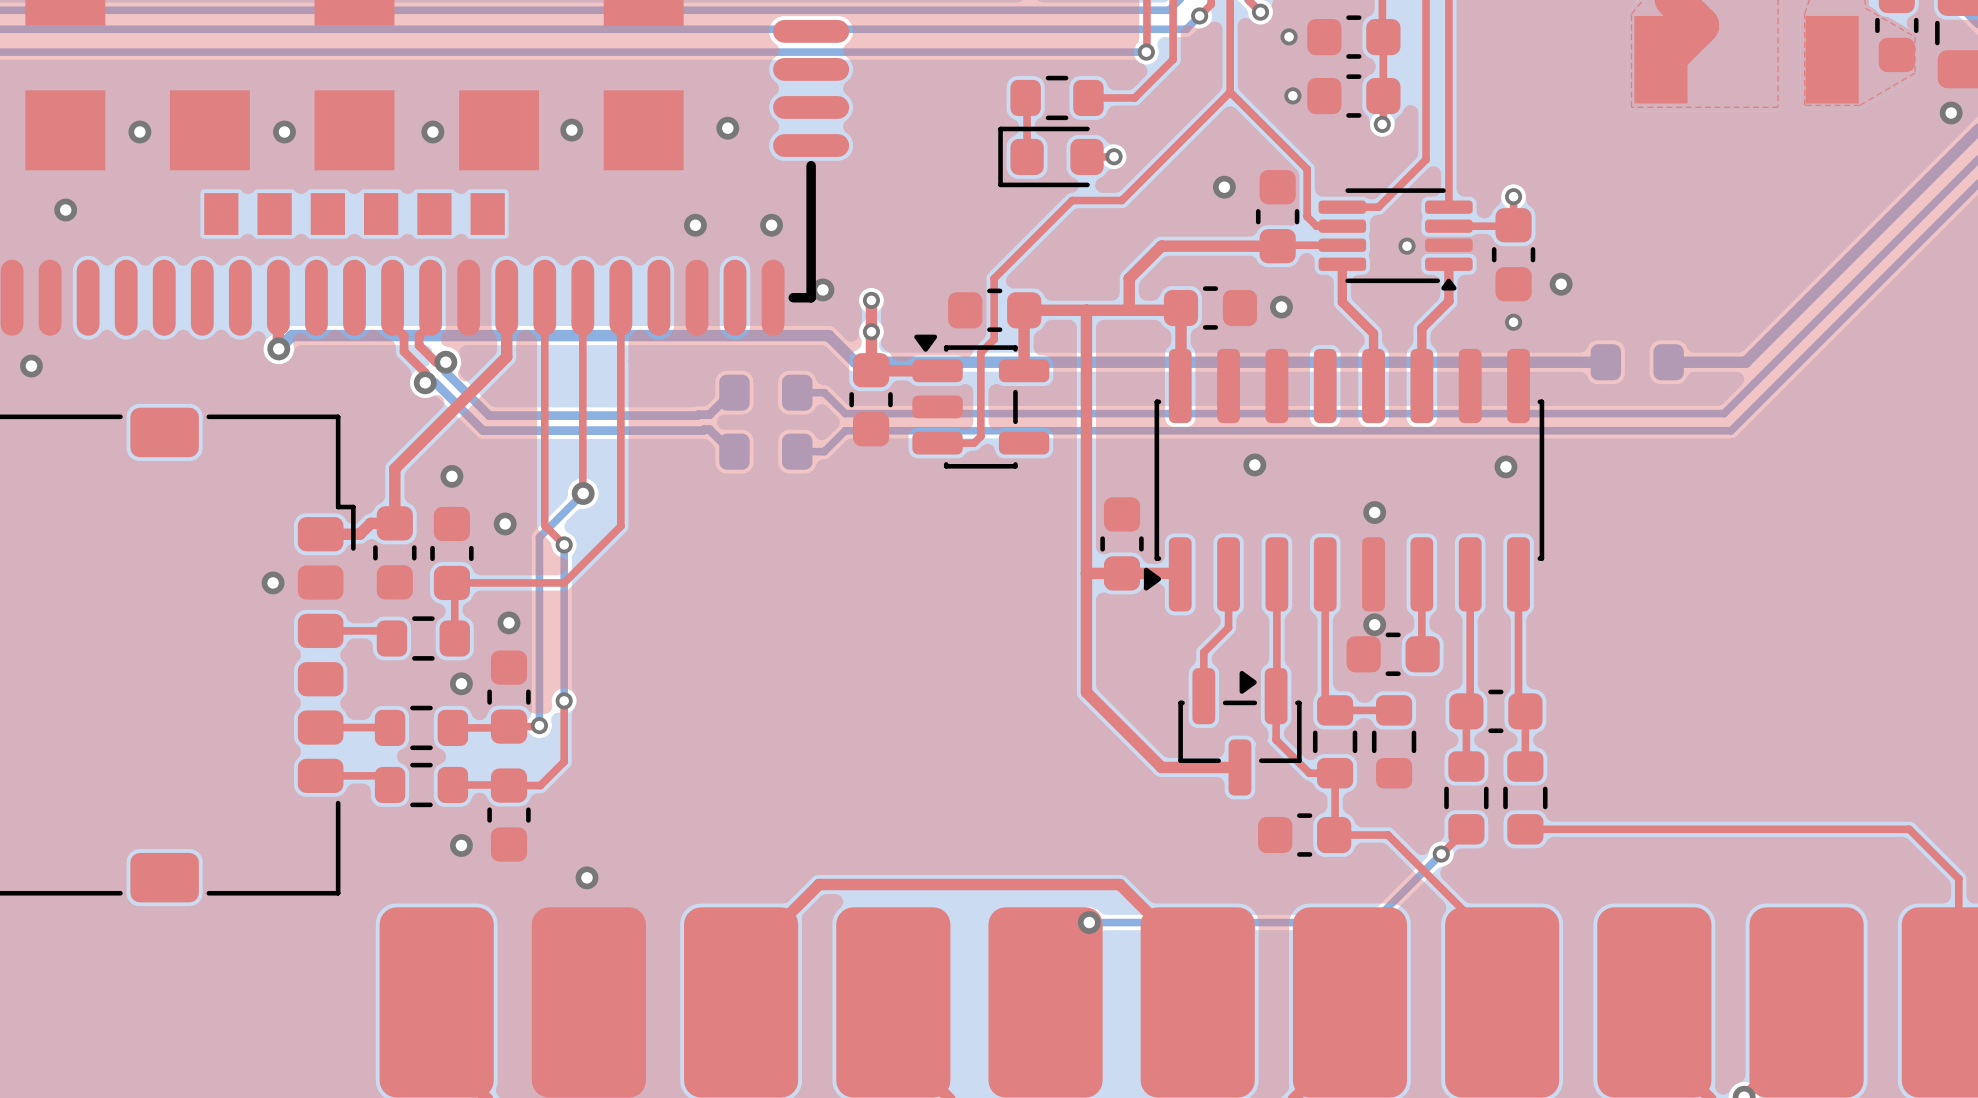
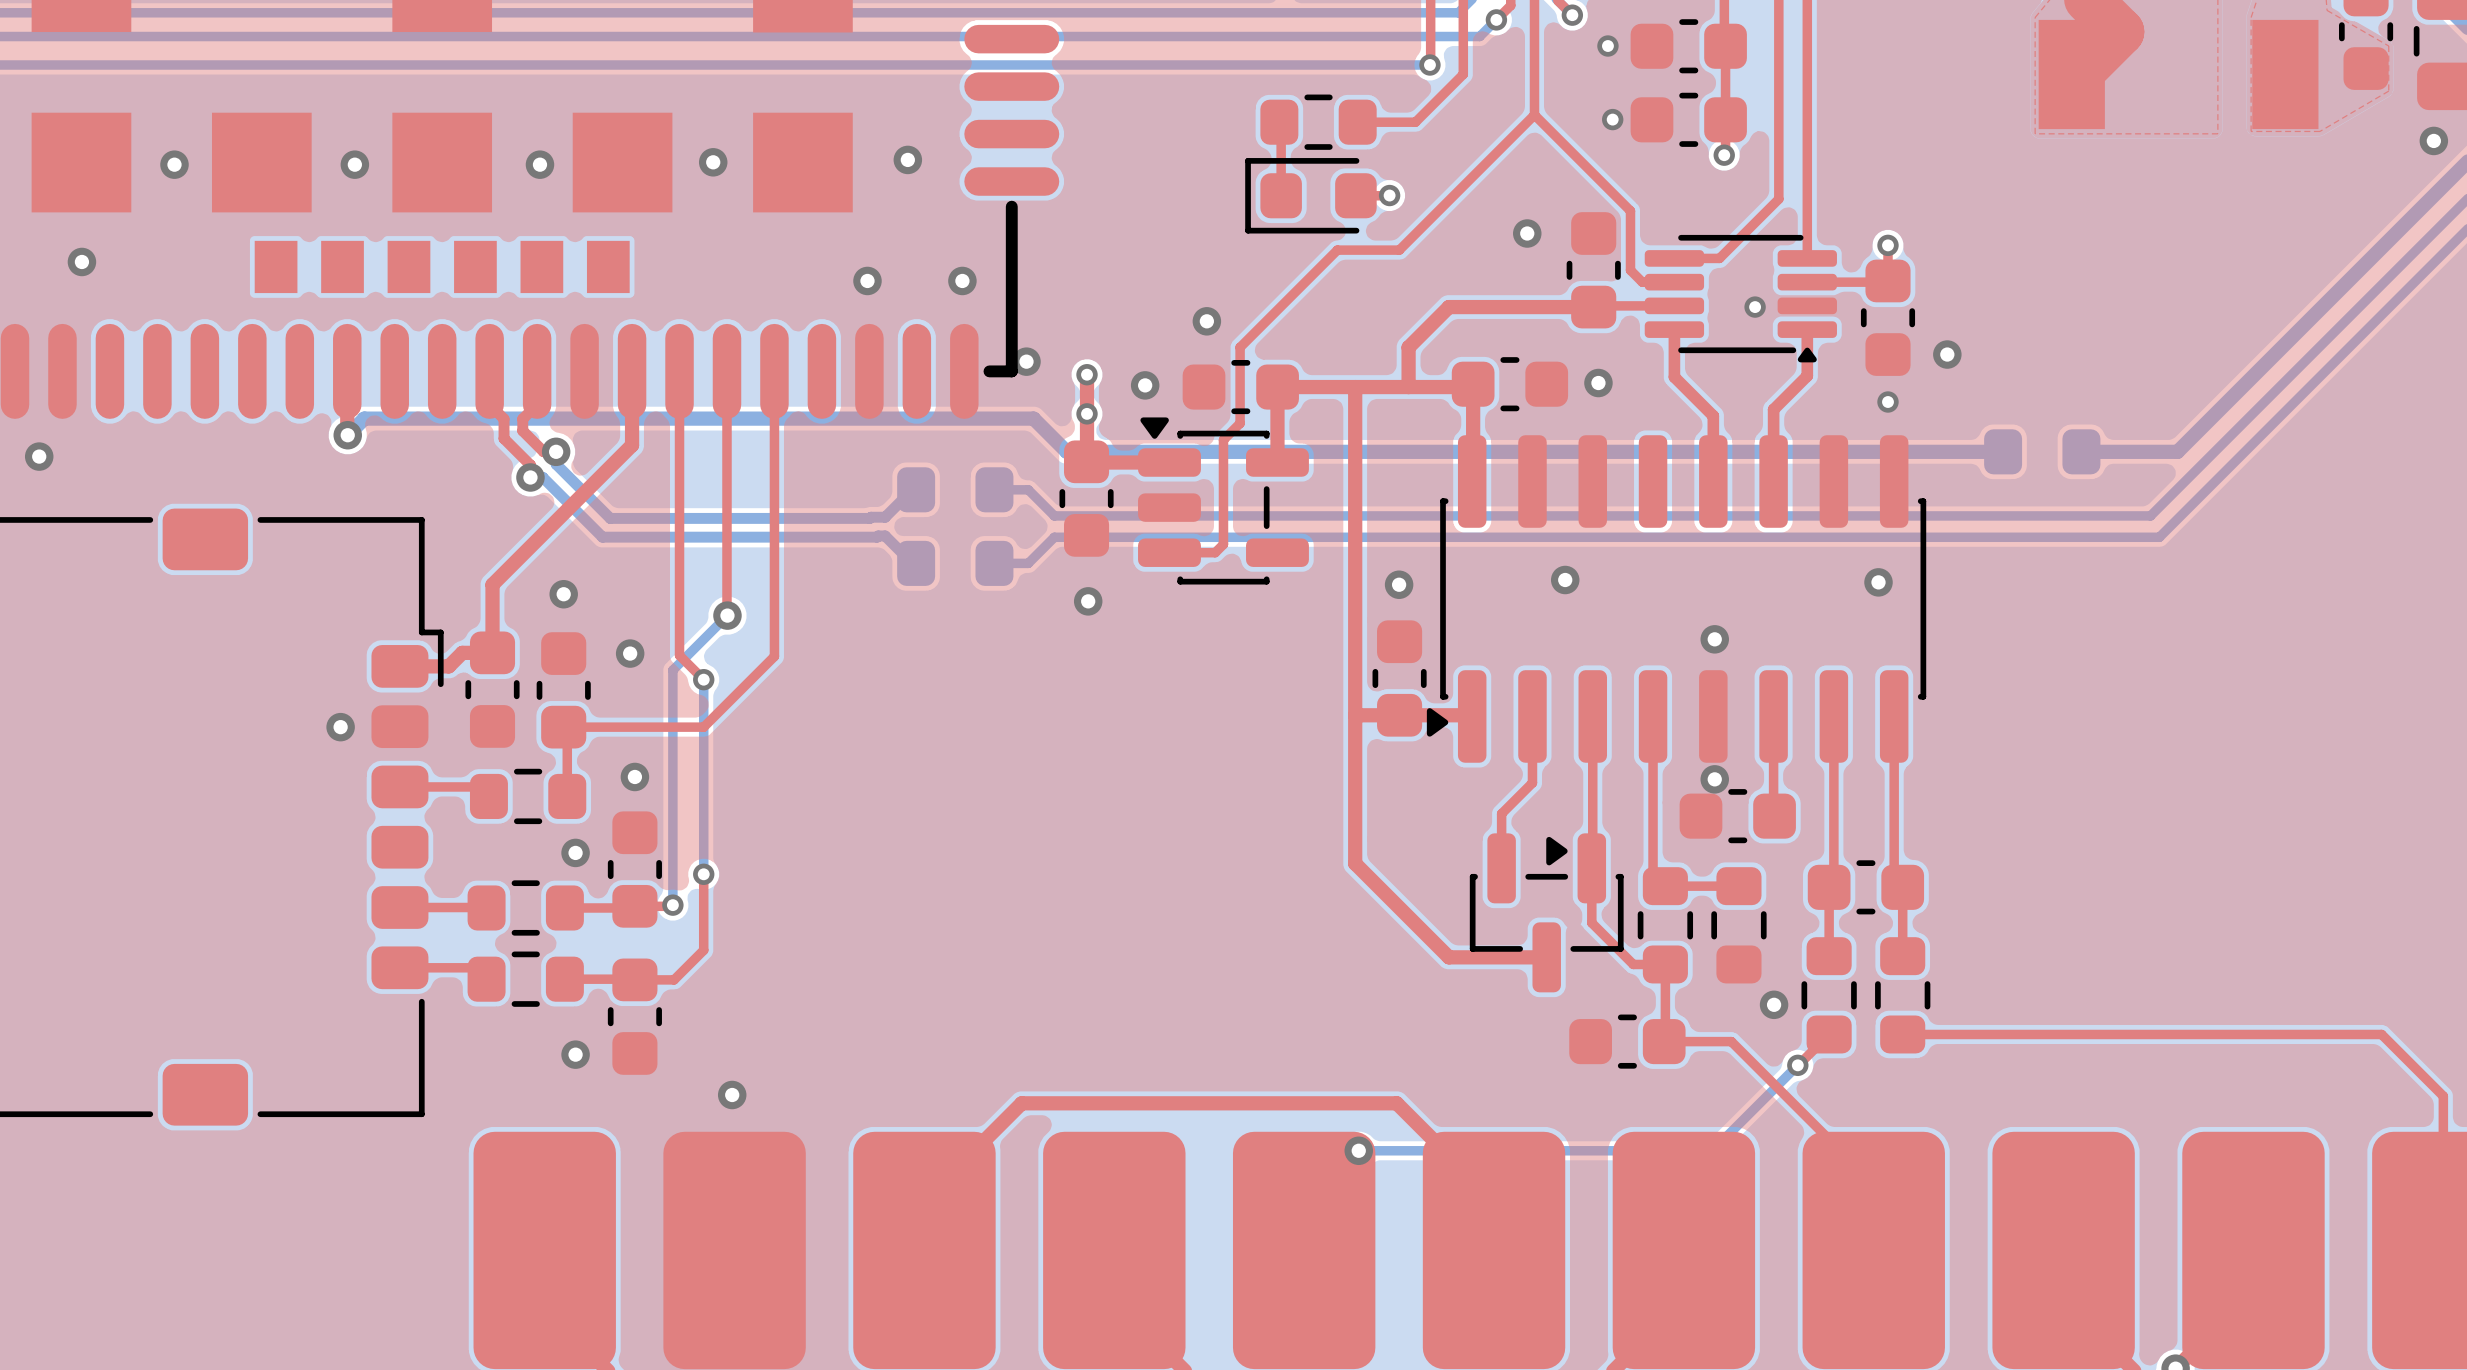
via: none -> (1206, 321)
via: none -> (1145, 385)
via: none -> (1399, 584)
via: none -> (1088, 601)
via: none -> (1774, 1004)

